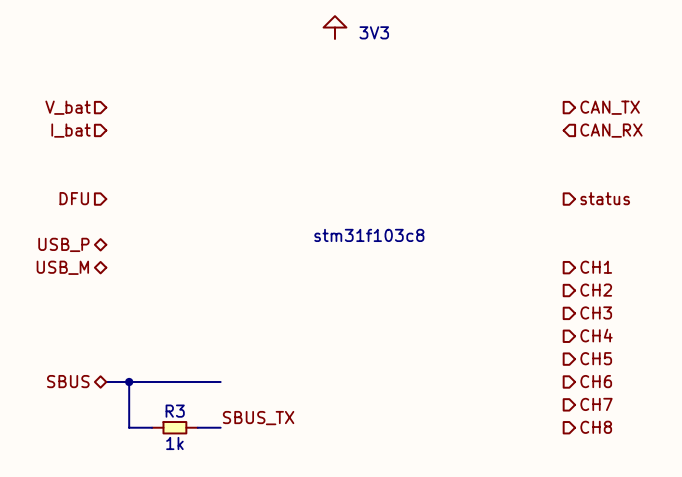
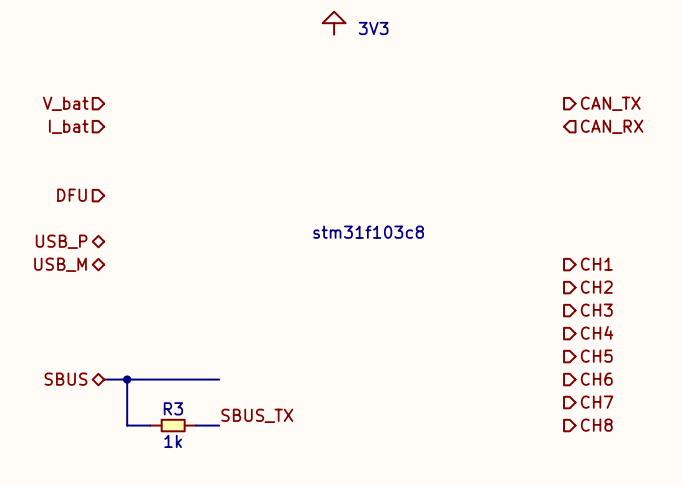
hierarchical label: status (605, 198) -> none

